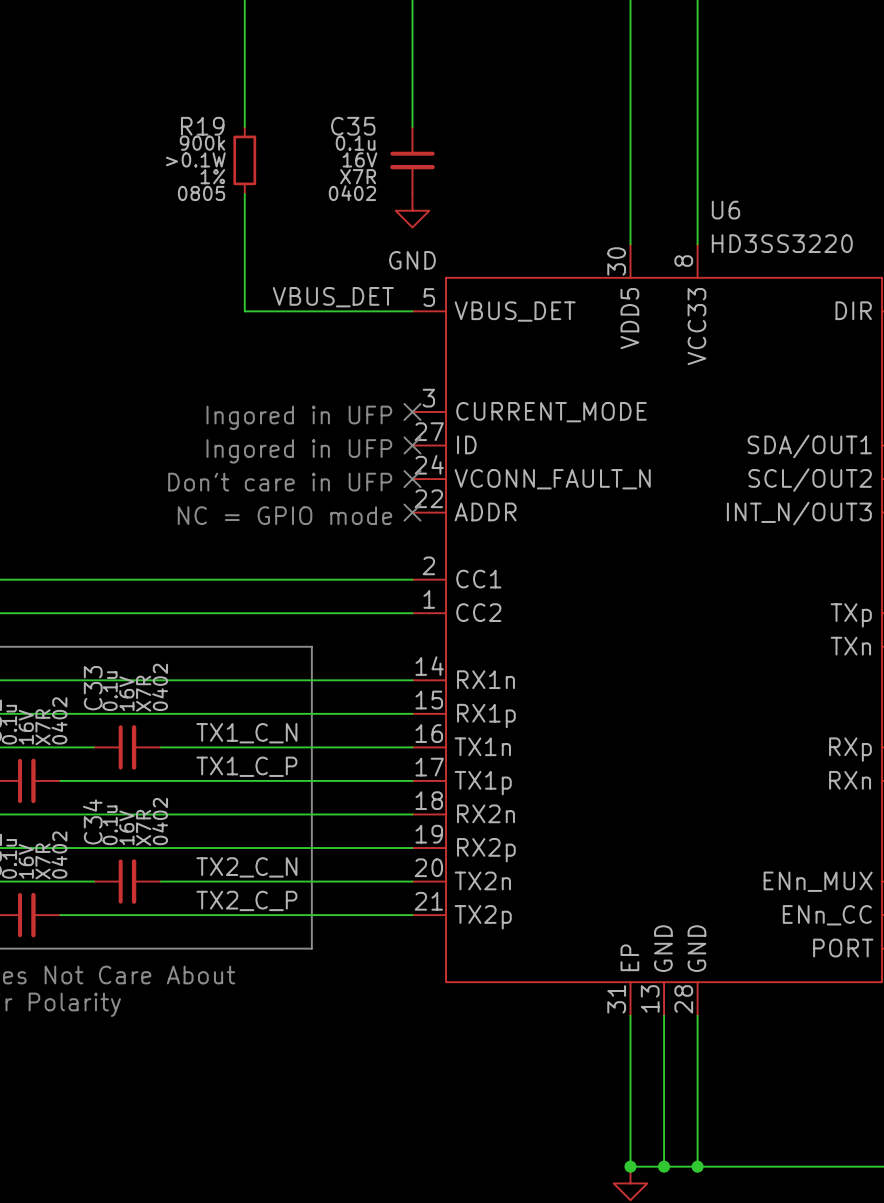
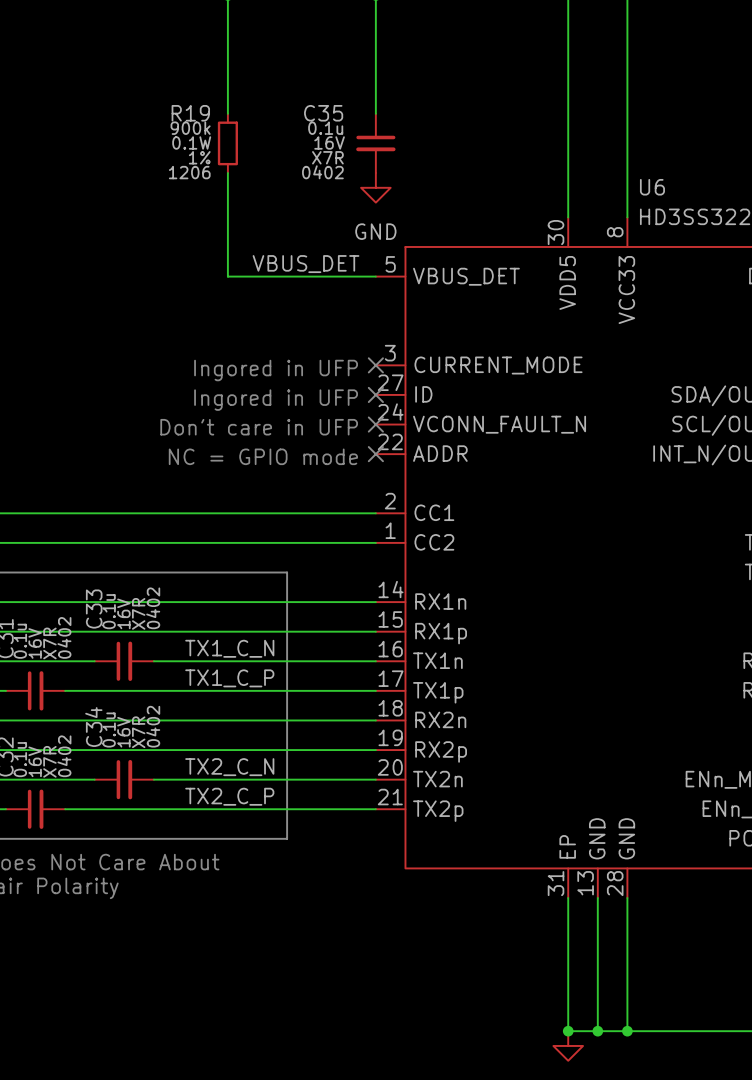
R19 text: >0.1W (195, 159) -> 0.1W (191, 142)
R19 text: 0805 (201, 193) -> 1206 (189, 172)

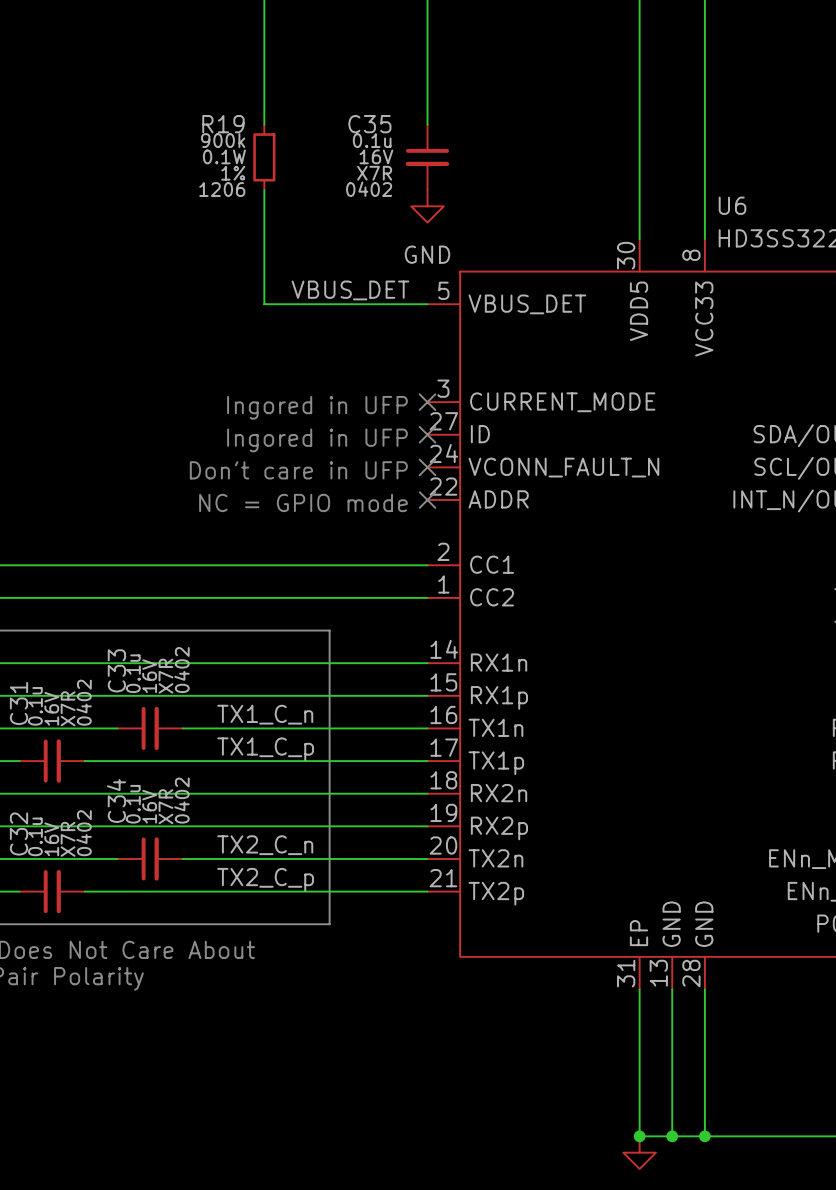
label: TX1_C_N (229, 648) -> TX1_C_n (265, 714)
label: TX1_C_P (229, 678) -> TX1_C_p (265, 749)
label: TX2_C_N (229, 767) -> TX2_C_n (265, 845)
label: TX2_C_P (229, 796) -> TX2_C_p (265, 879)

